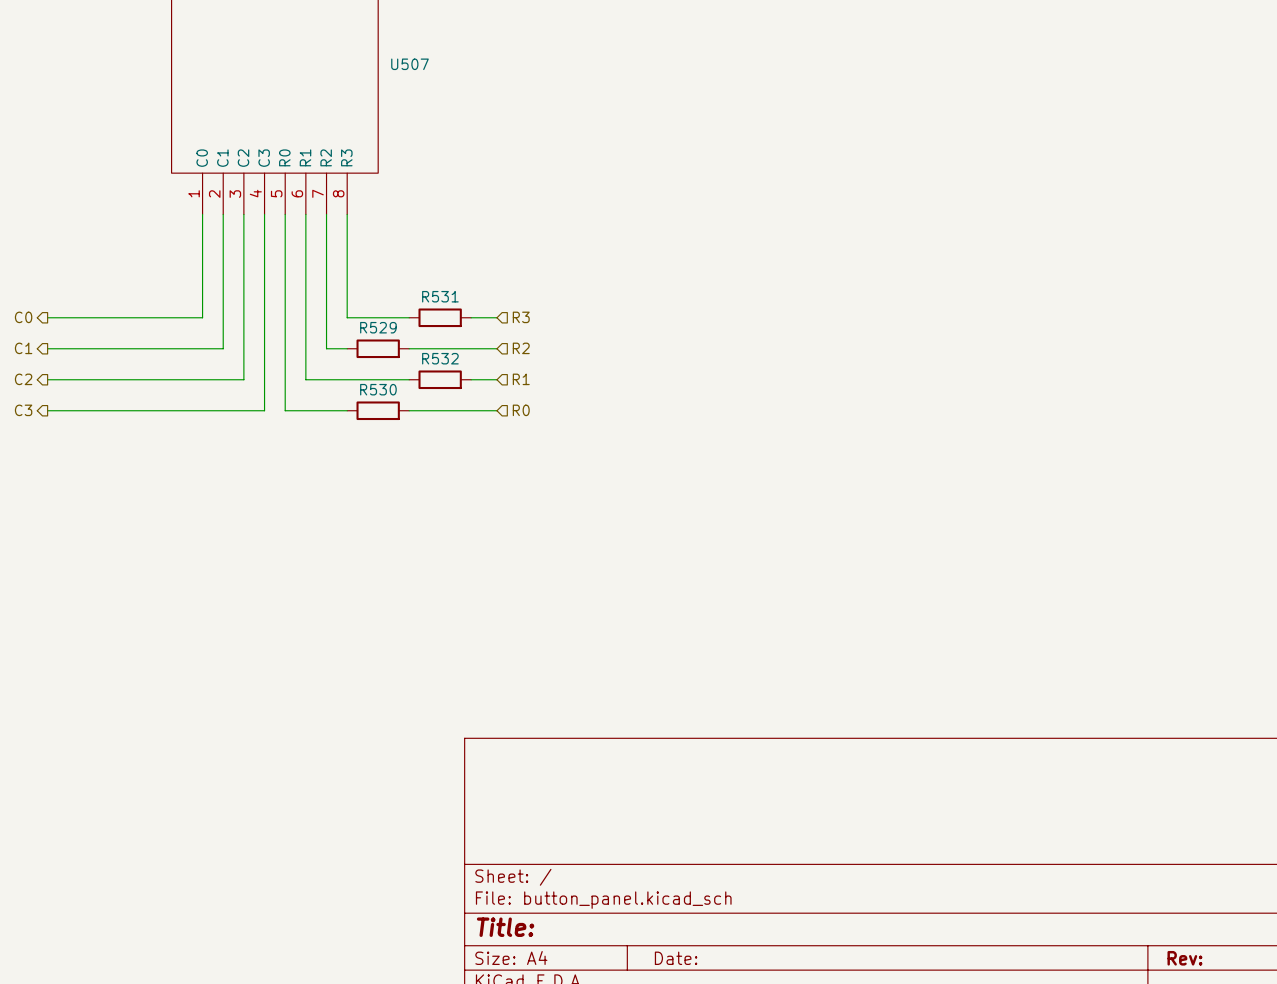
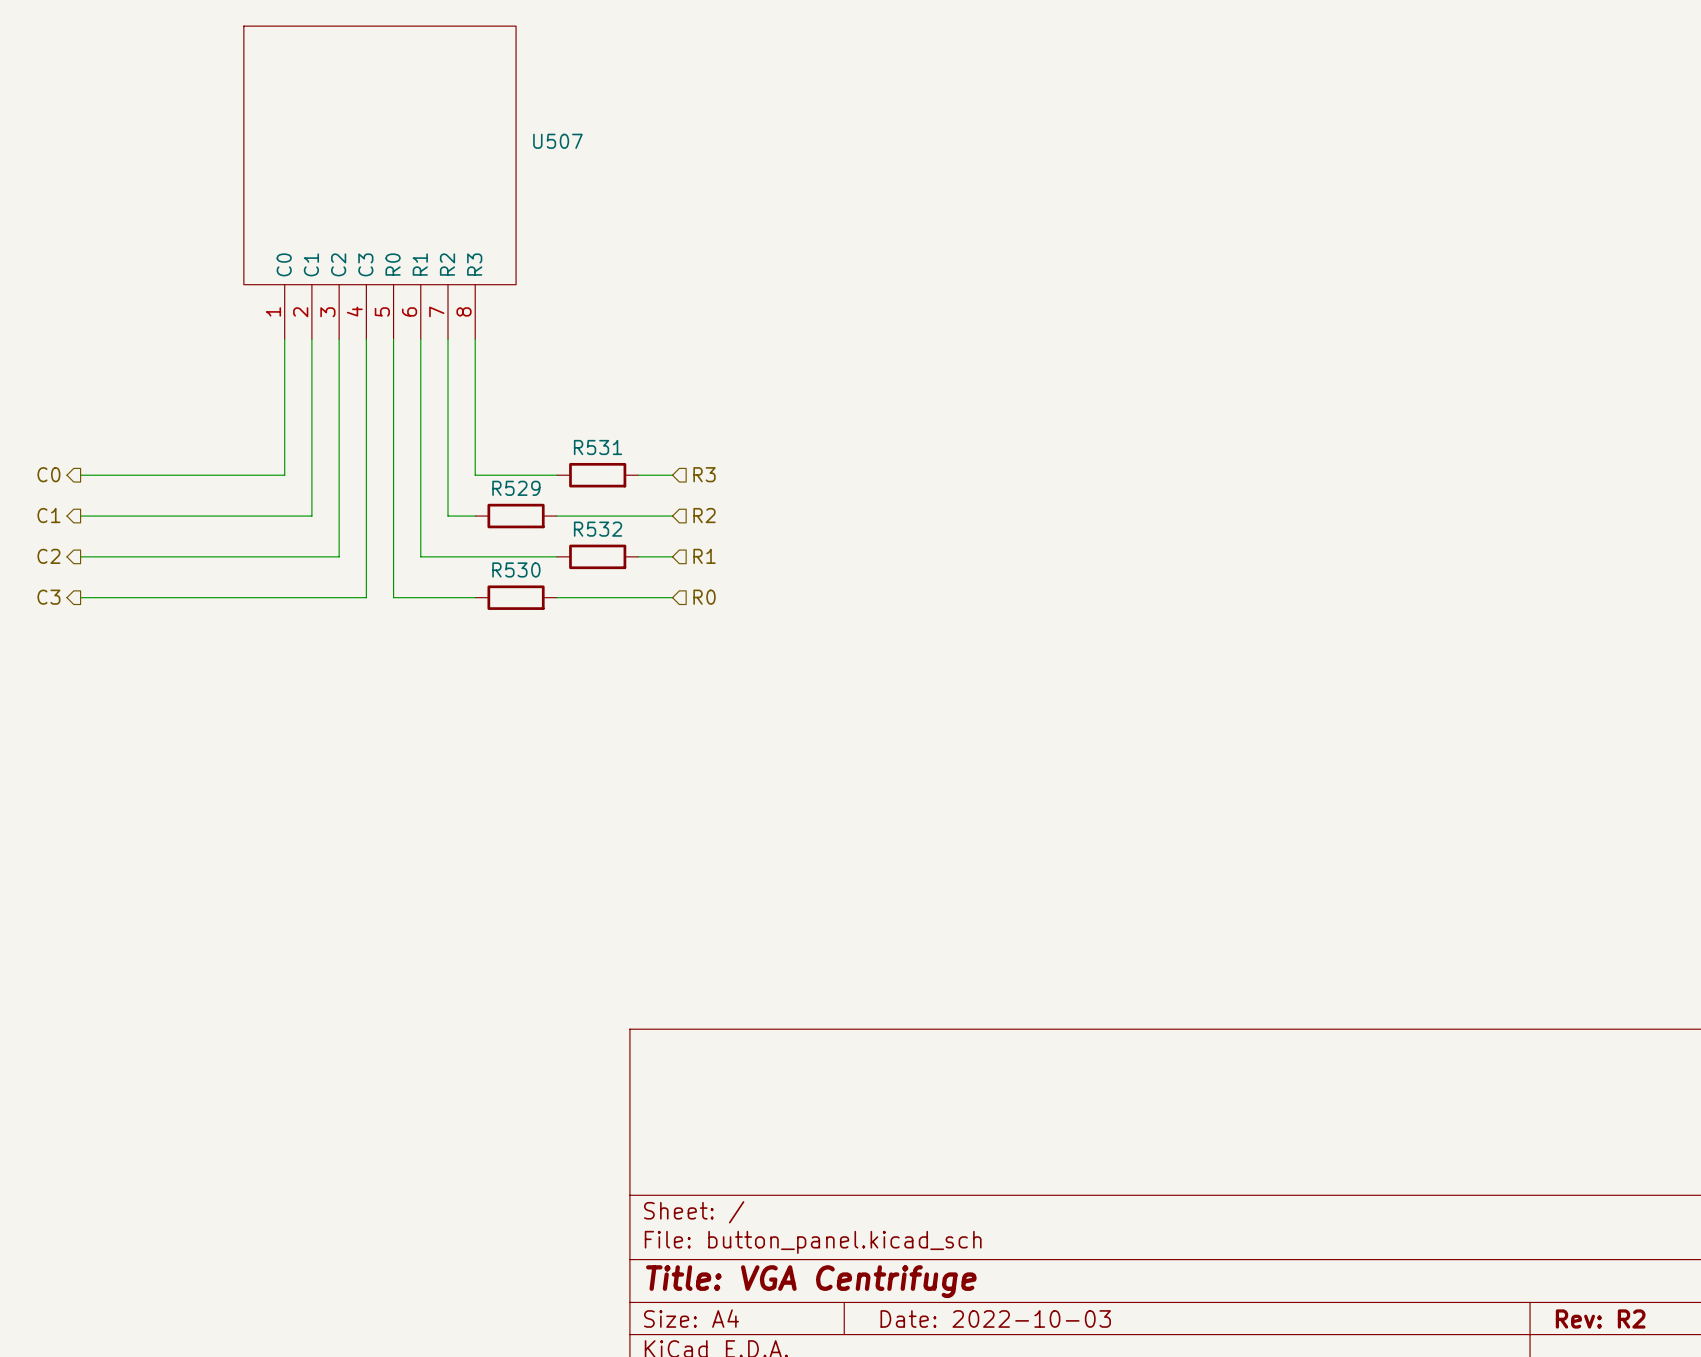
title block: Title: (505, 927) -> Title: VGA Centrifuge (811, 1281)
title block: Date: (676, 958) -> Date: 2022-10-03 (995, 1318)
title block: Rev: (1184, 958) -> Rev: R2 (1600, 1318)

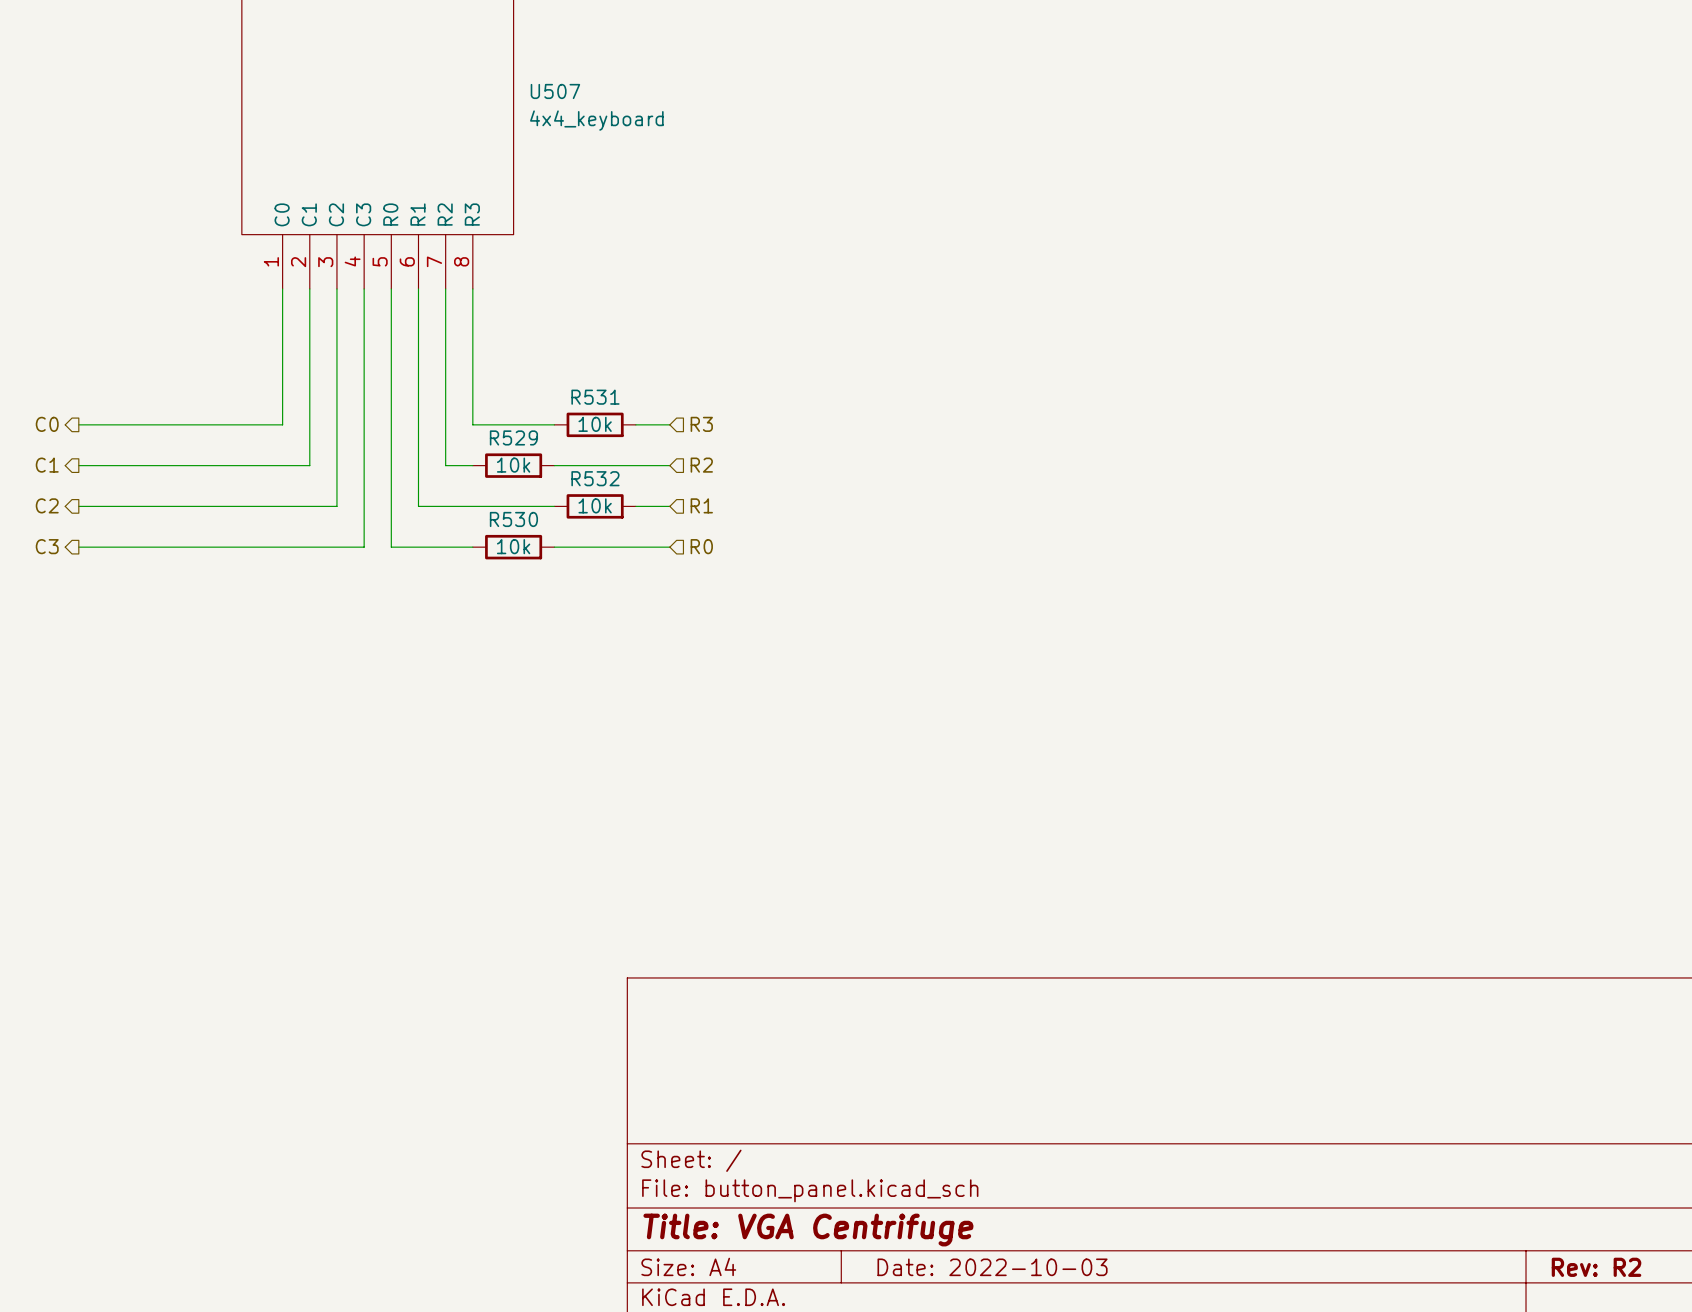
U507 value: none -> 4x4_keyboard (596, 120)
R531 value: none -> 10k (595, 424)
R529 value: none -> 10k (513, 465)
R532 value: none -> 10k (595, 505)
R530 value: none -> 10k (513, 546)

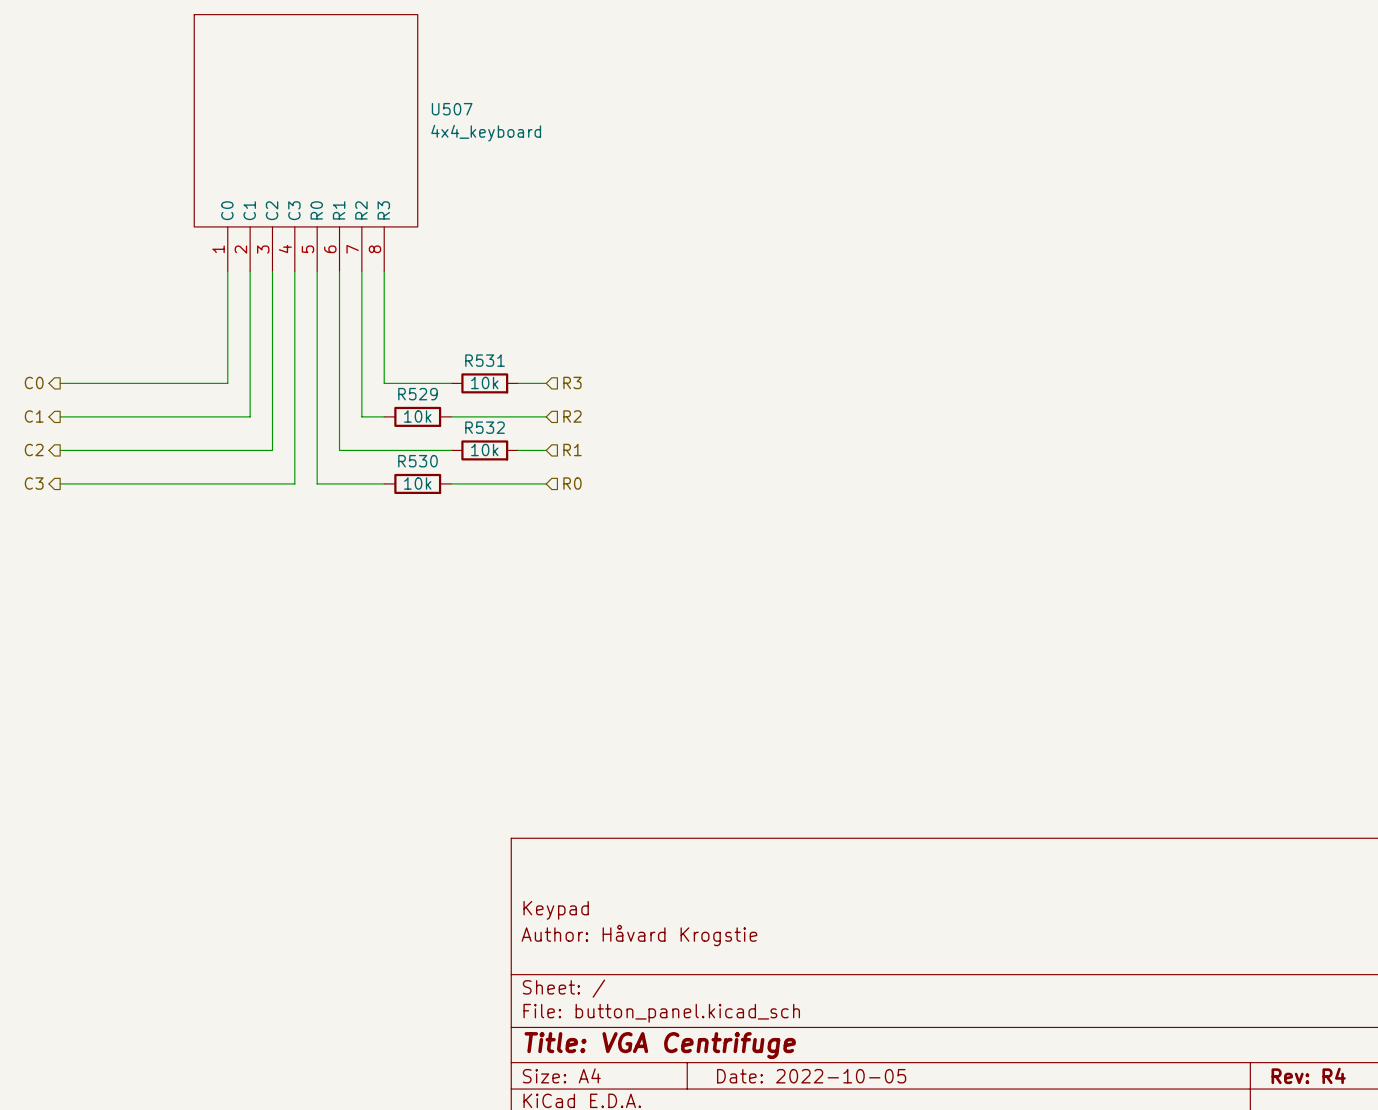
title block: none -> Keypad (556, 910)
title block: none -> Author: Håvard Krogstie (639, 935)
title block: Date: 2022-10-03 (992, 1267) -> Date: 2022-10-05 (811, 1076)
title block: Rev: R2 (1596, 1267) -> Rev: R4 (1308, 1075)

